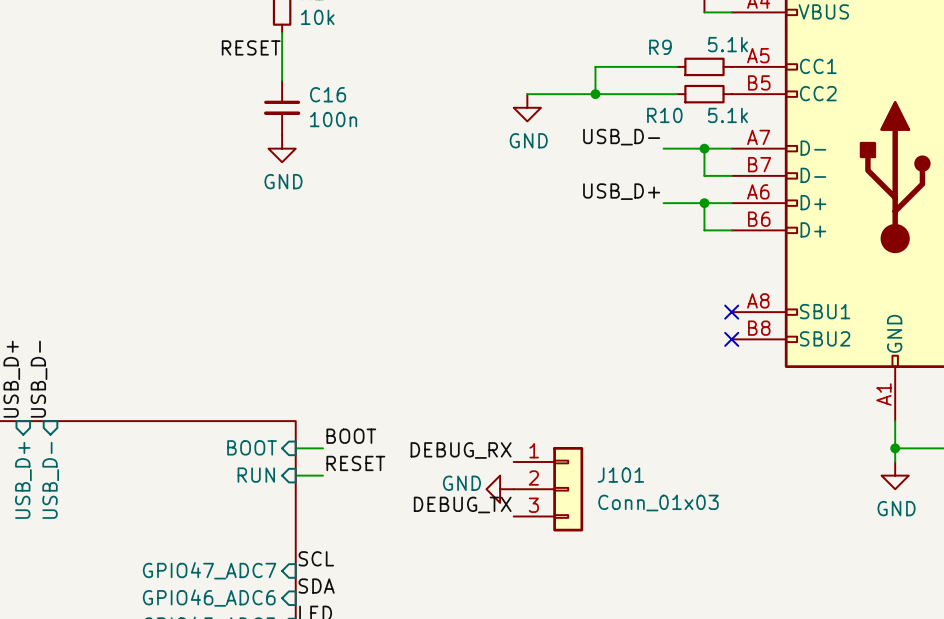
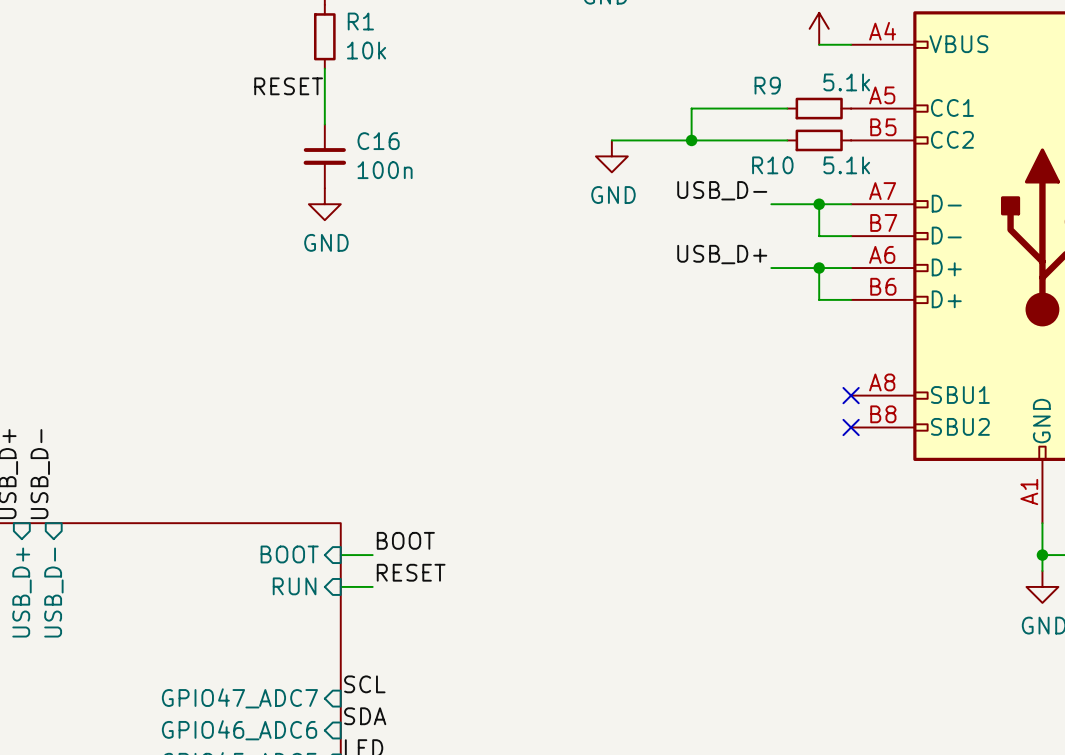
label: DEBUG_RX (461, 450) -> none
power symbol: GND (500, 489) -> none
J101: Conn_01x03 (548, 489) -> none
label: DEBUG_TX (462, 504) -> none

